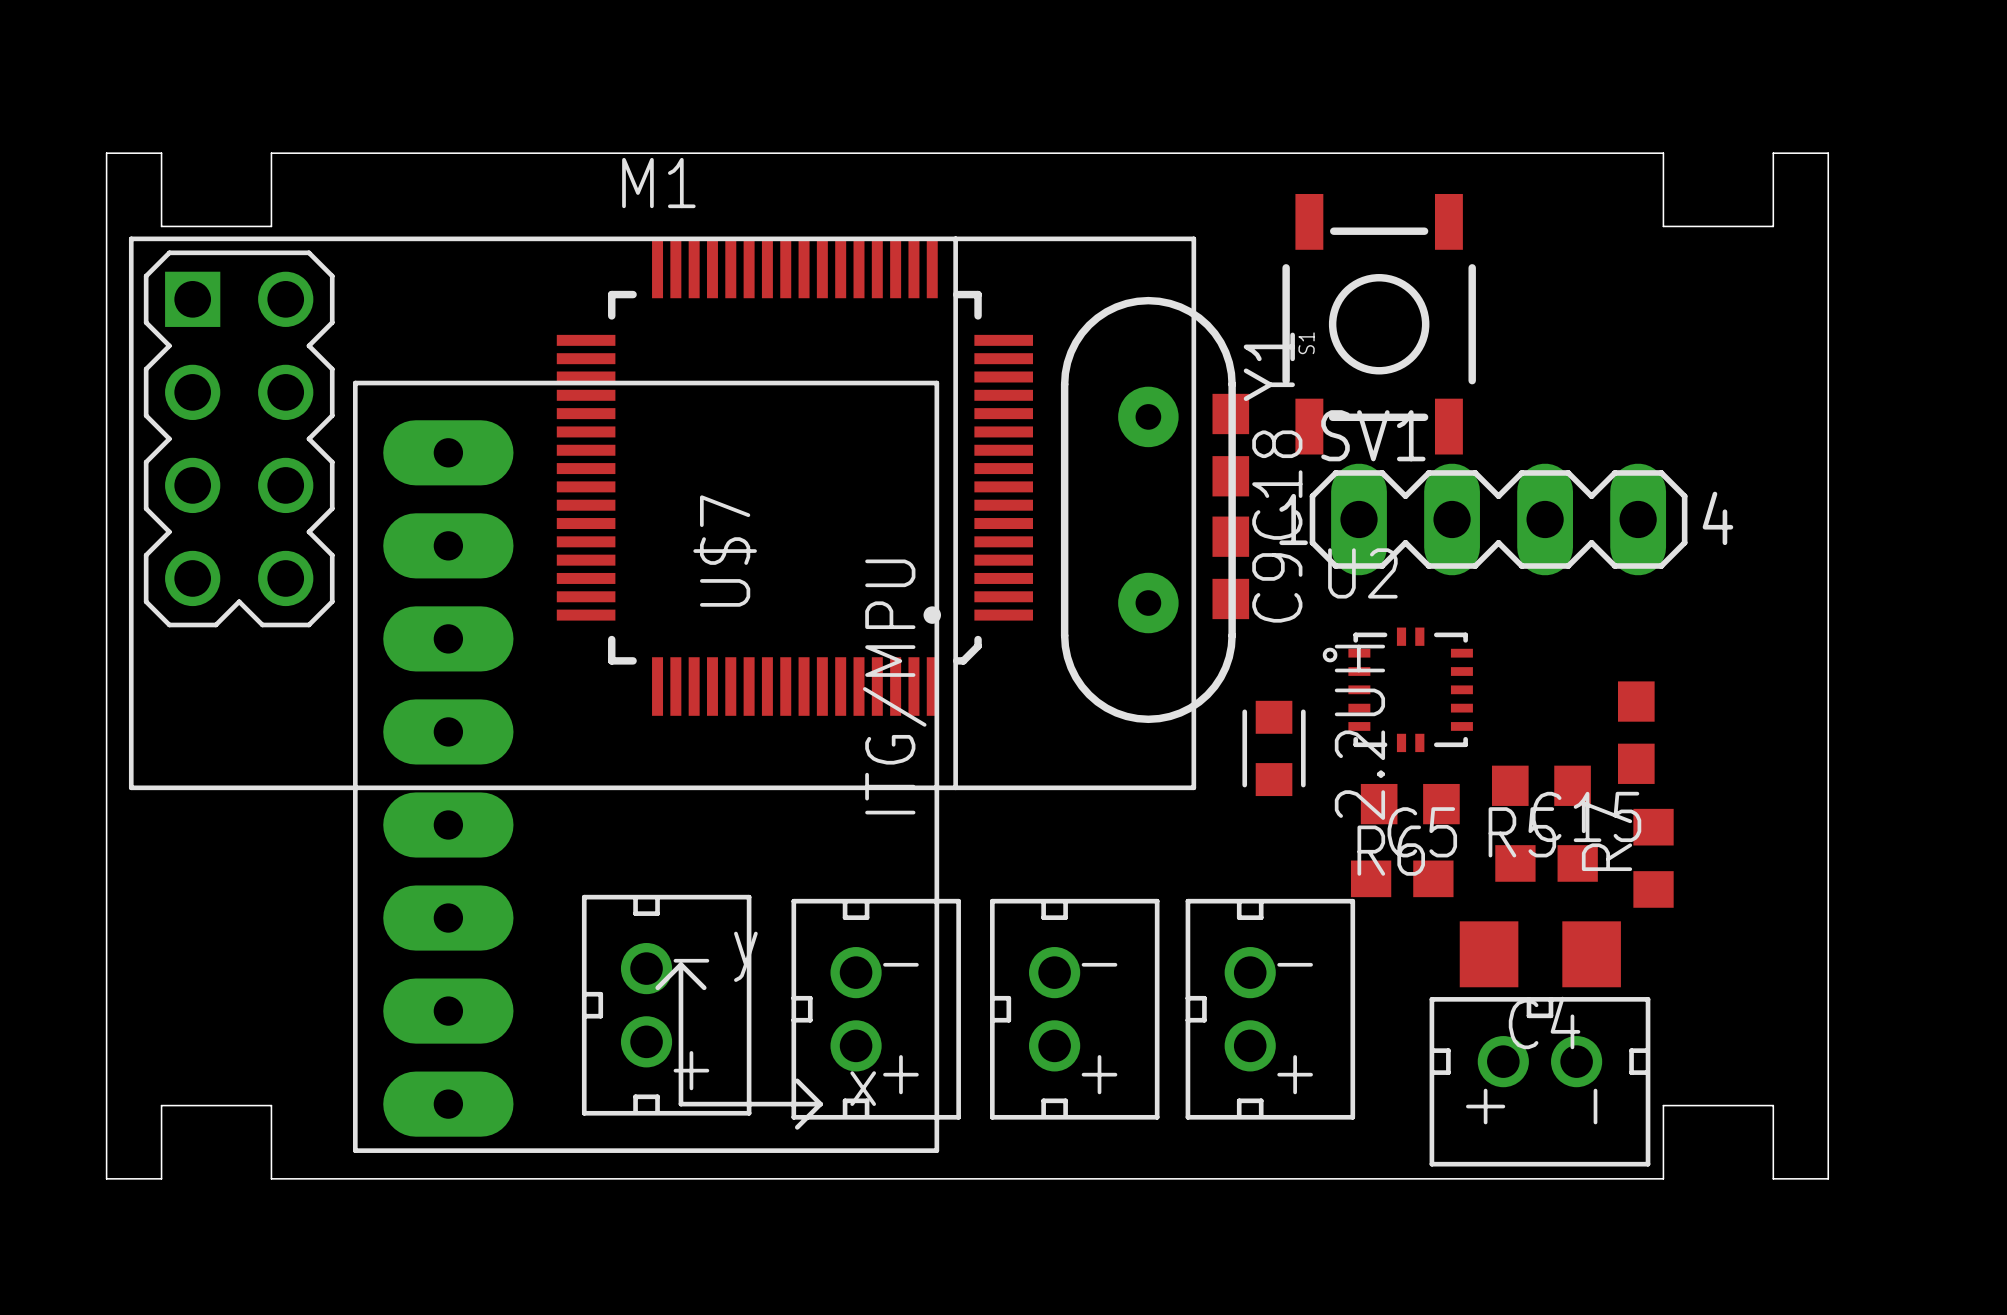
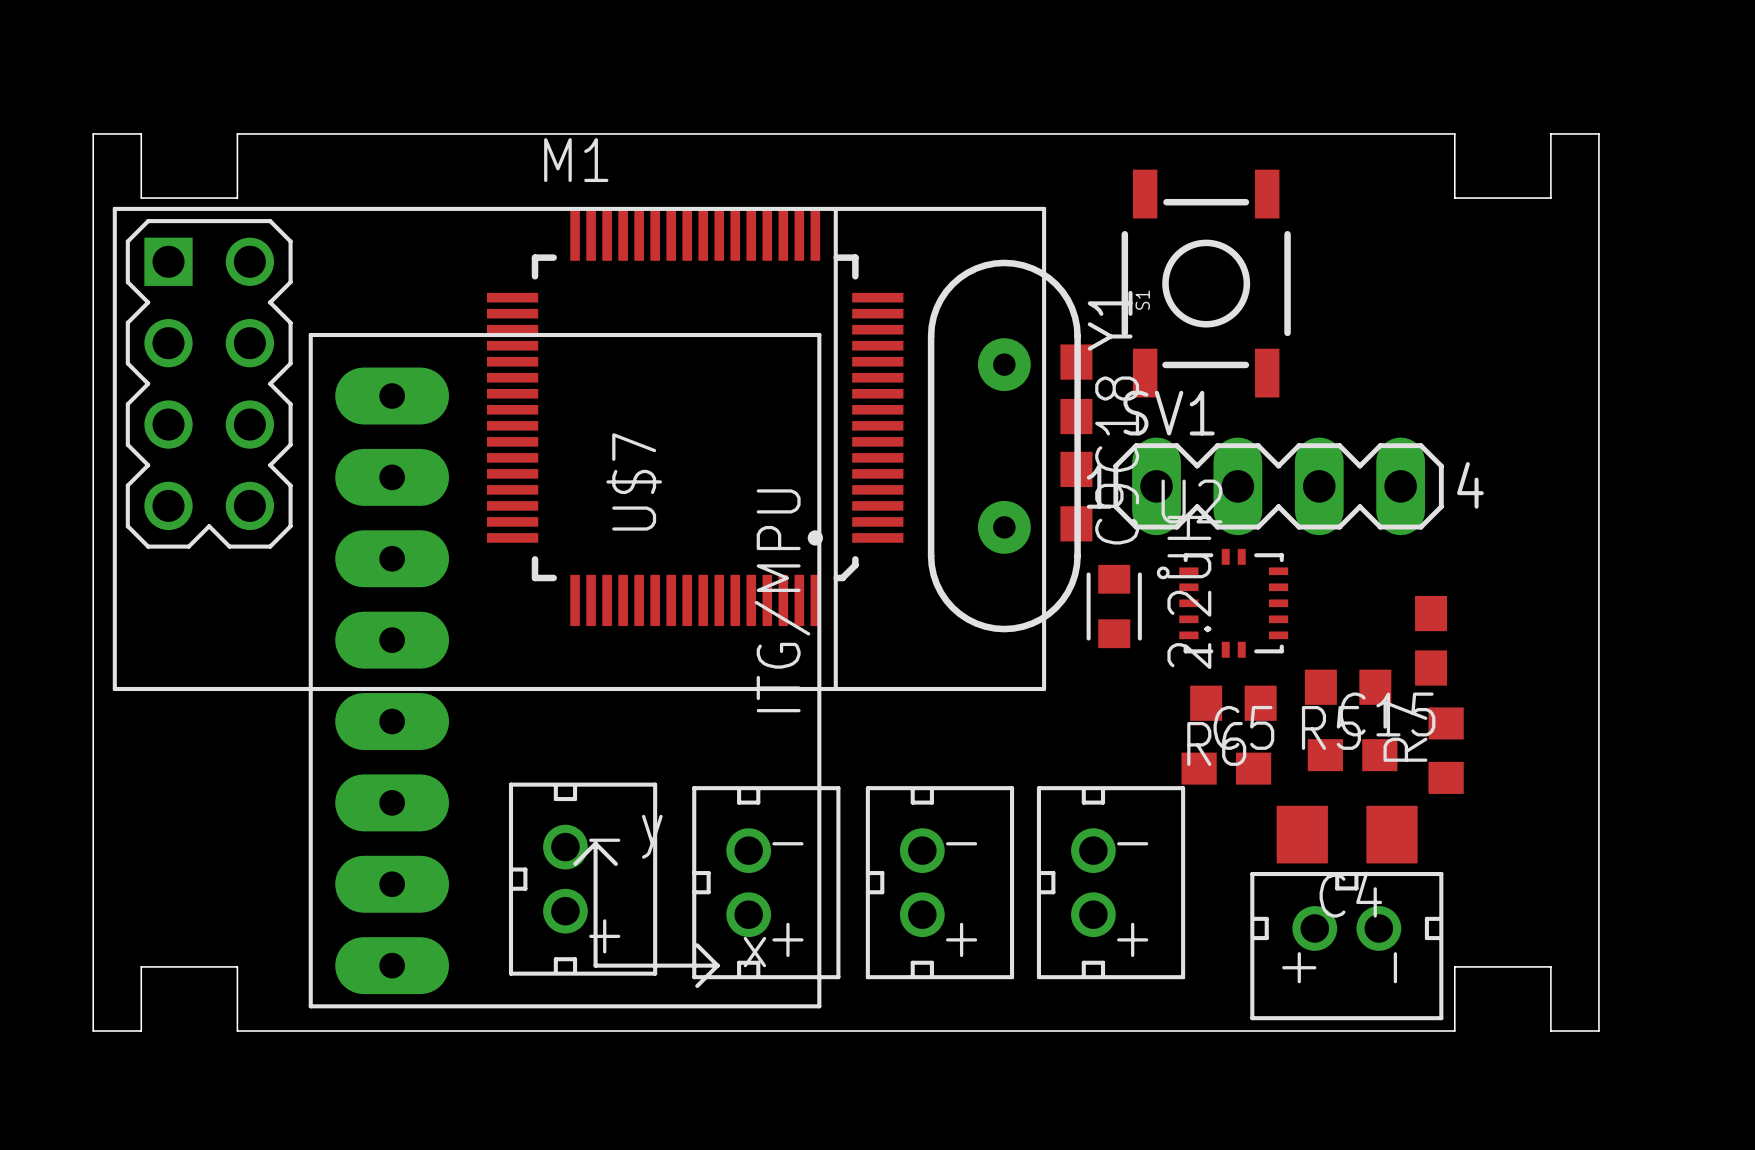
SV1 position: (1498, 519) -> (1278, 486)
2.2UH position: (1274, 748) -> (1114, 606)

